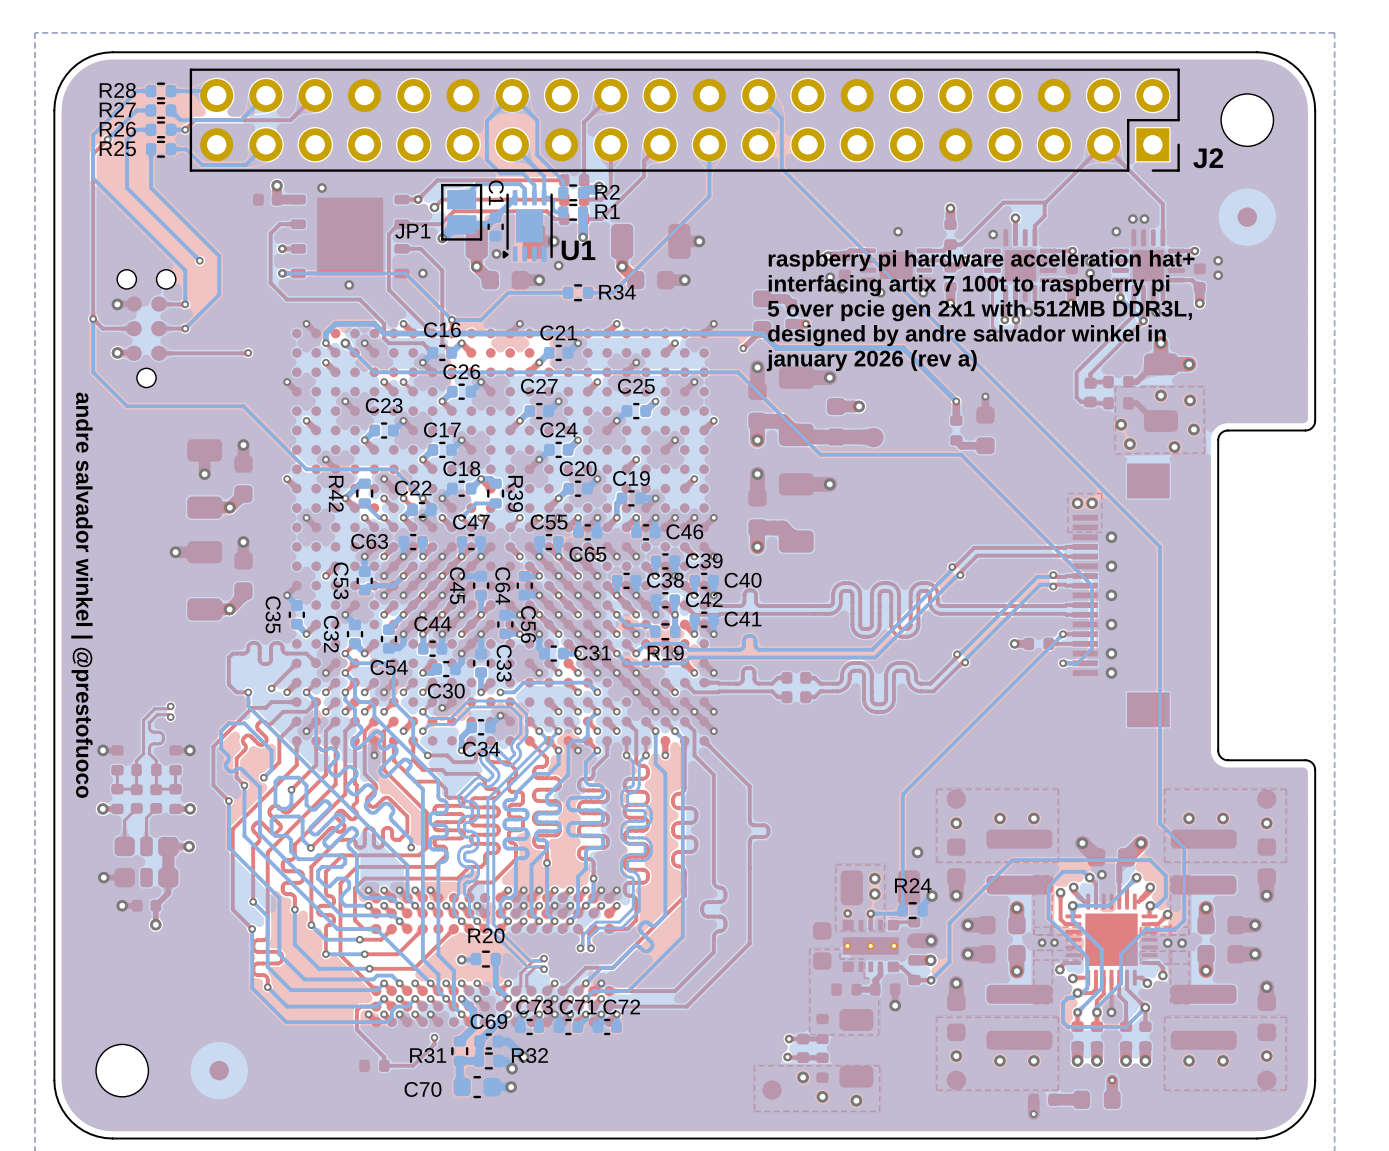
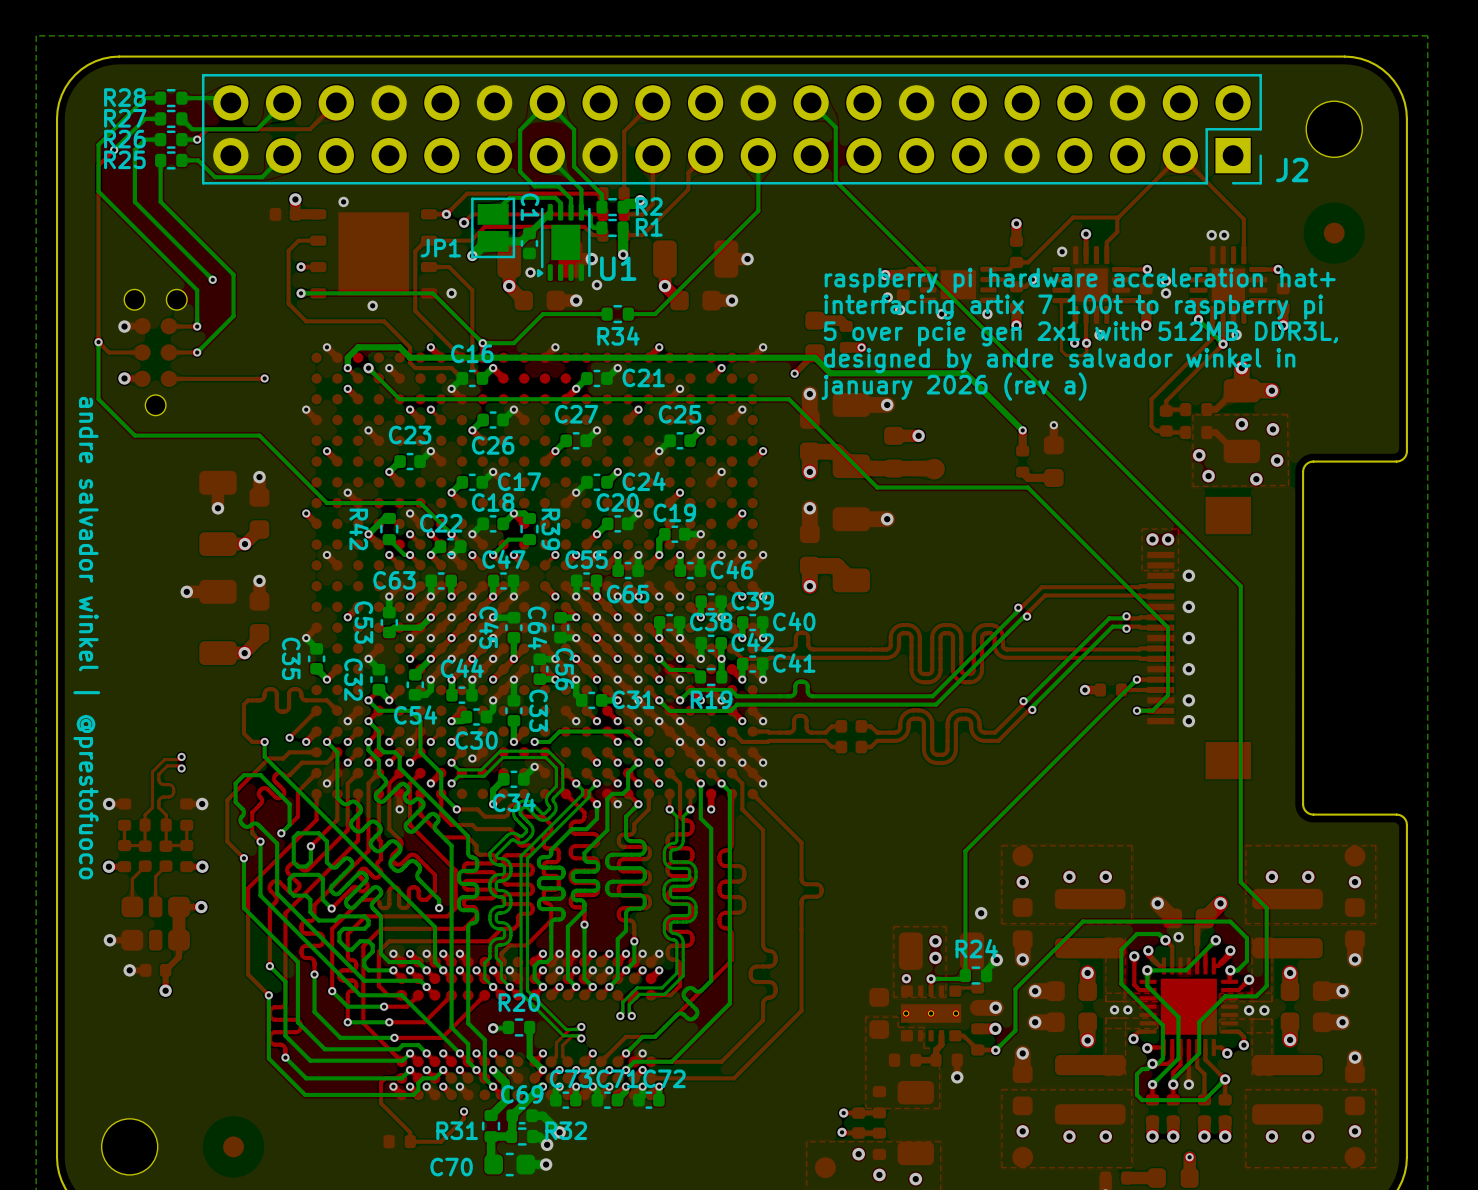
via: (898, 231) -> none
via: (1116, 231) -> none
via: (1218, 260) -> none
via: (1218, 275) -> none
R34 name position: R34 (617, 292) -> R34 (618, 335)
C21 name position: C21 (558, 332) -> C21 (643, 377)
C26 name position: C26 (461, 371) -> C26 (493, 445)
C17 name position: C17 (442, 429) -> C17 (519, 481)
C24 name position: C24 (558, 429) -> C24 (644, 481)

